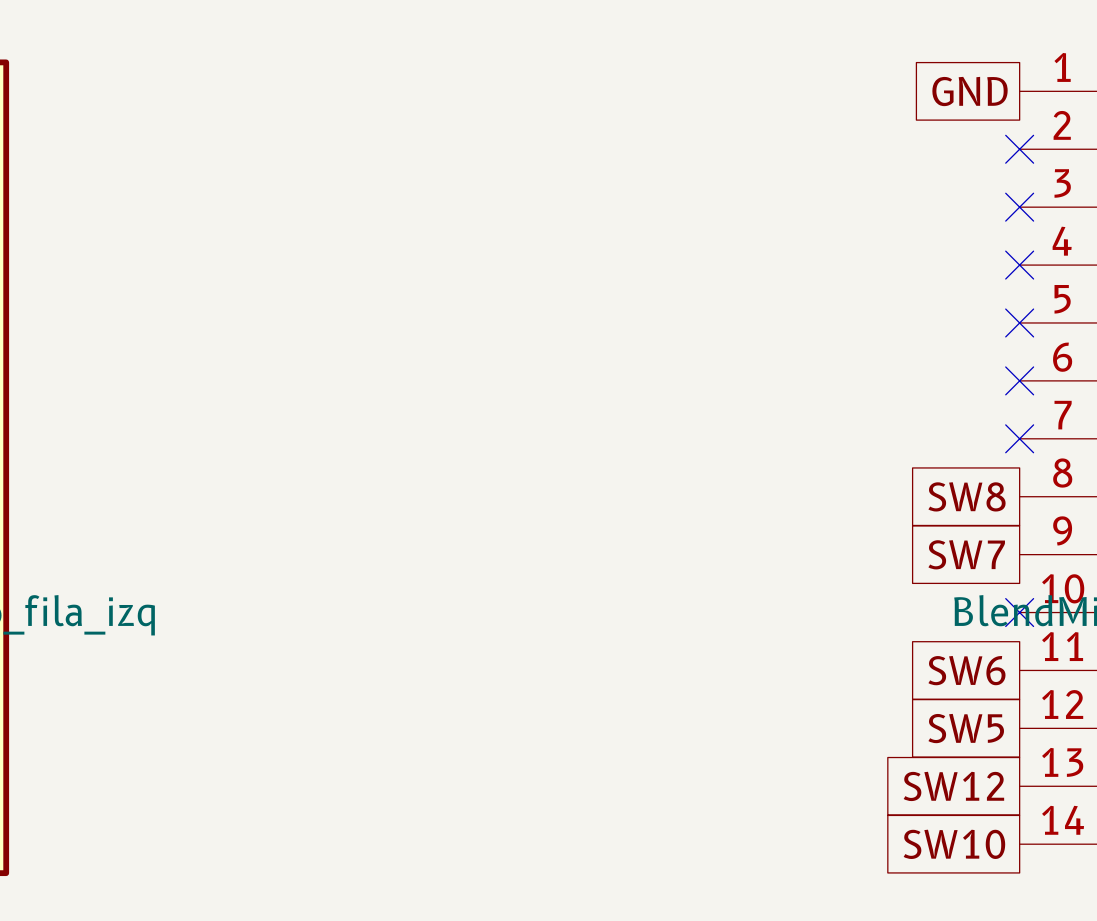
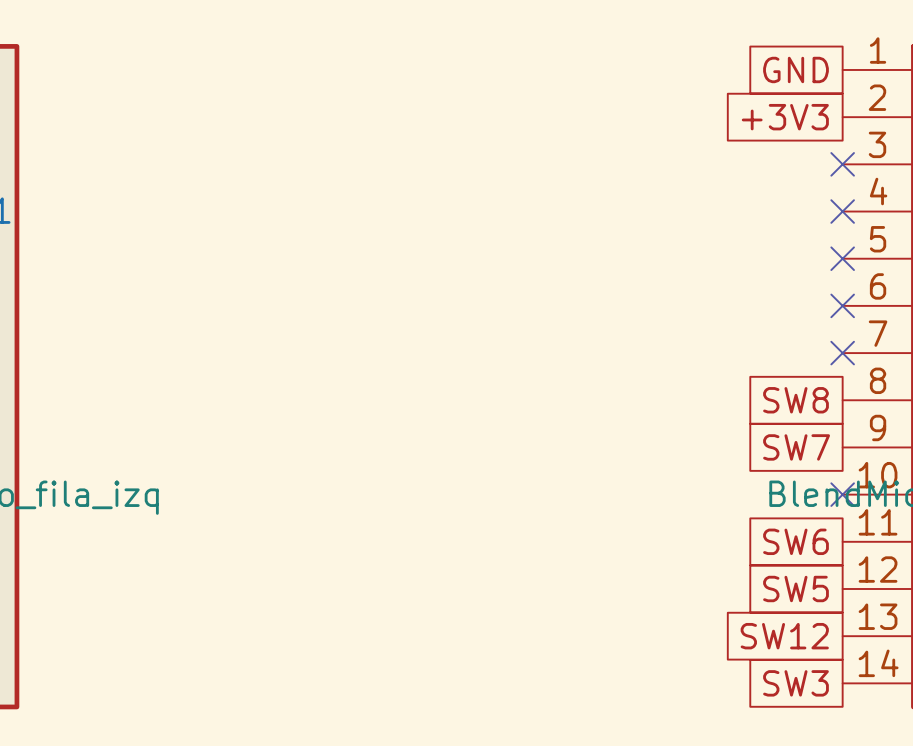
global label: none -> +3V3 (785, 117)
no-connect mark: (1019, 149) -> none
global label: SW10 (954, 844) -> SW3 (795, 683)

